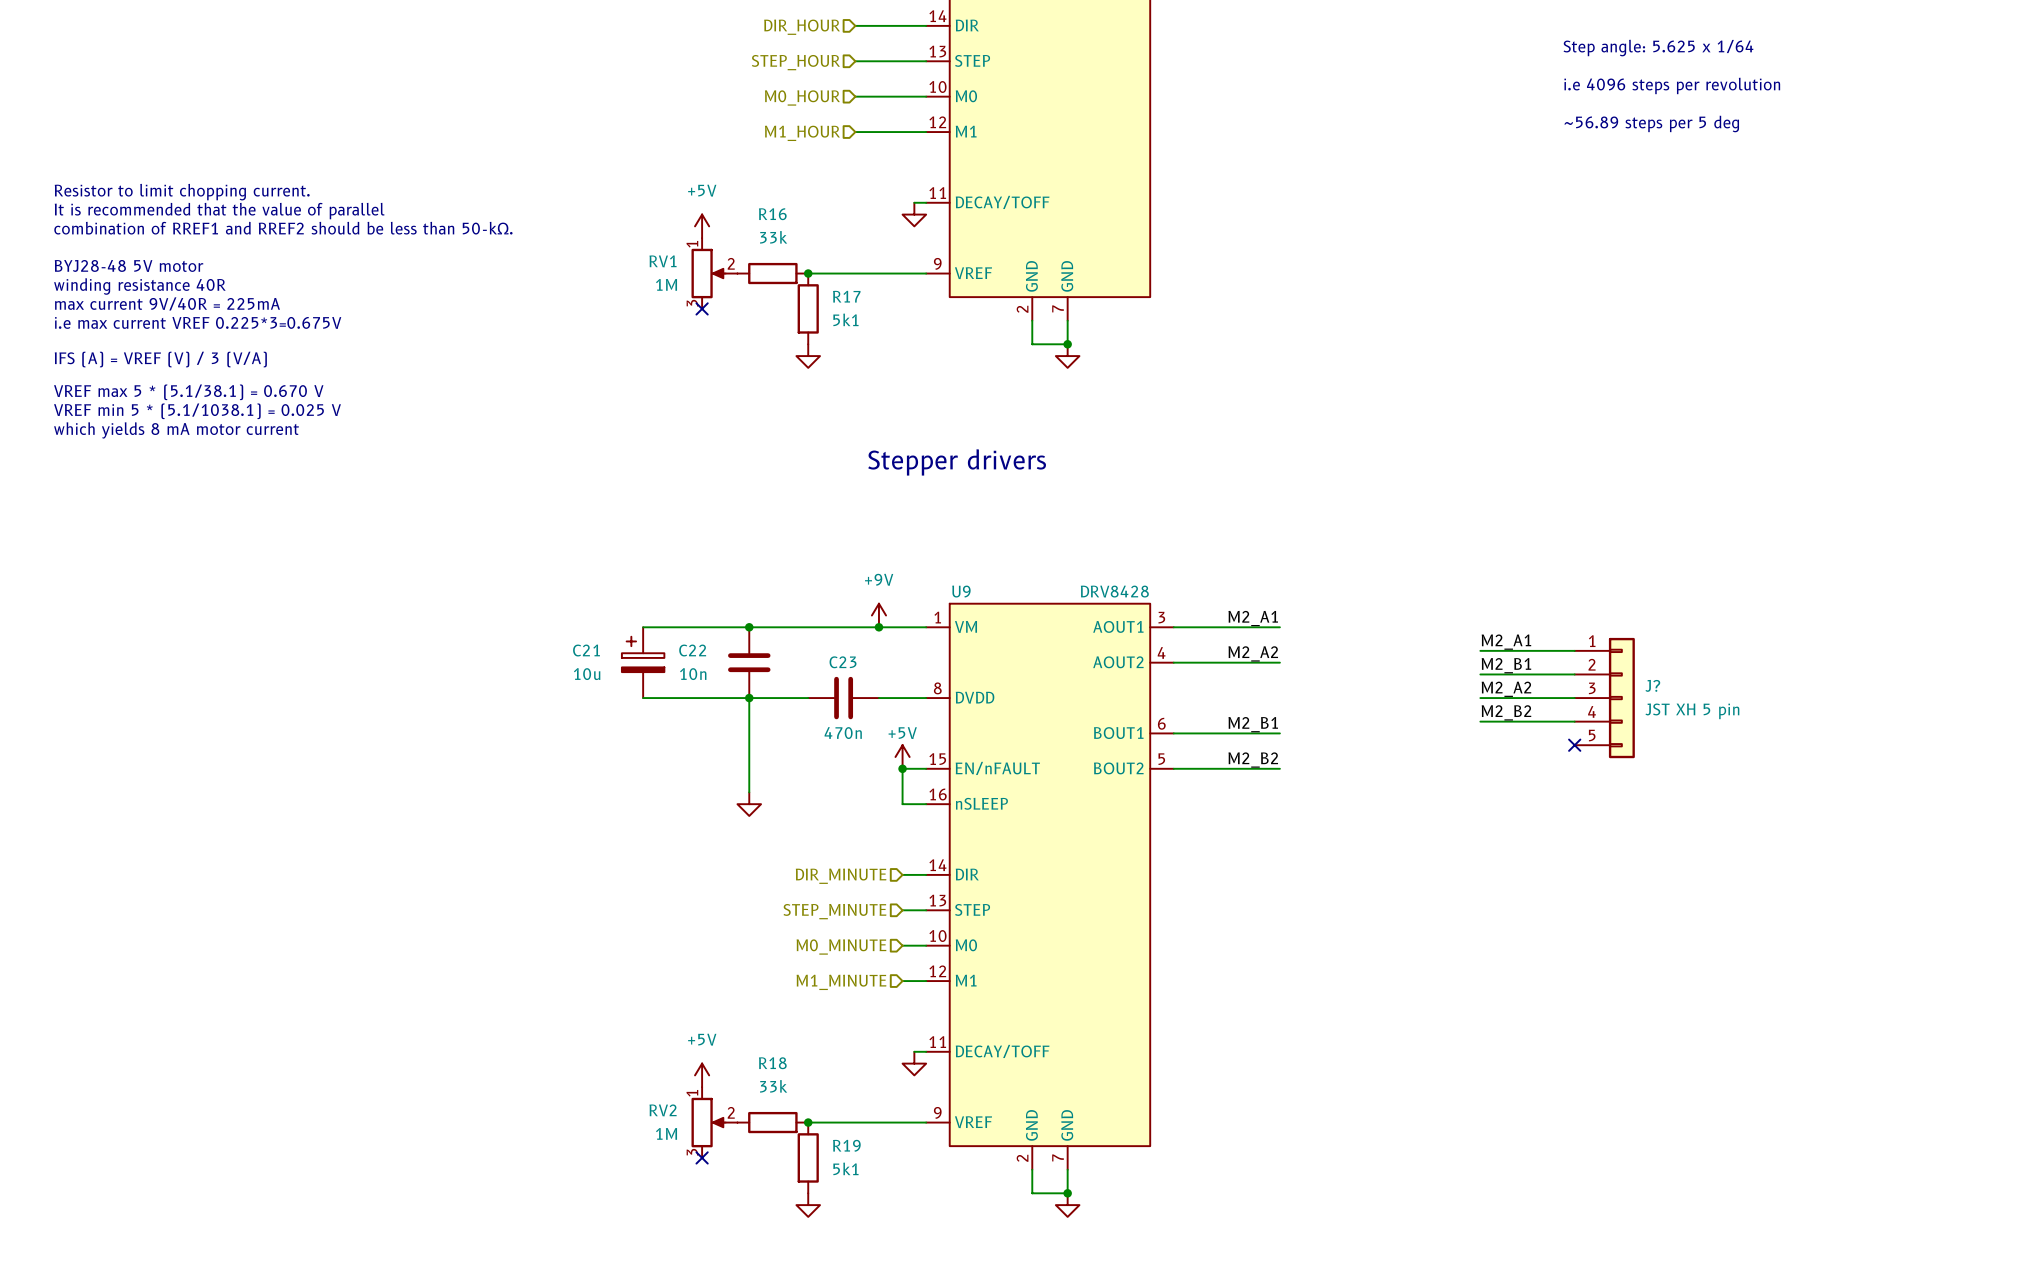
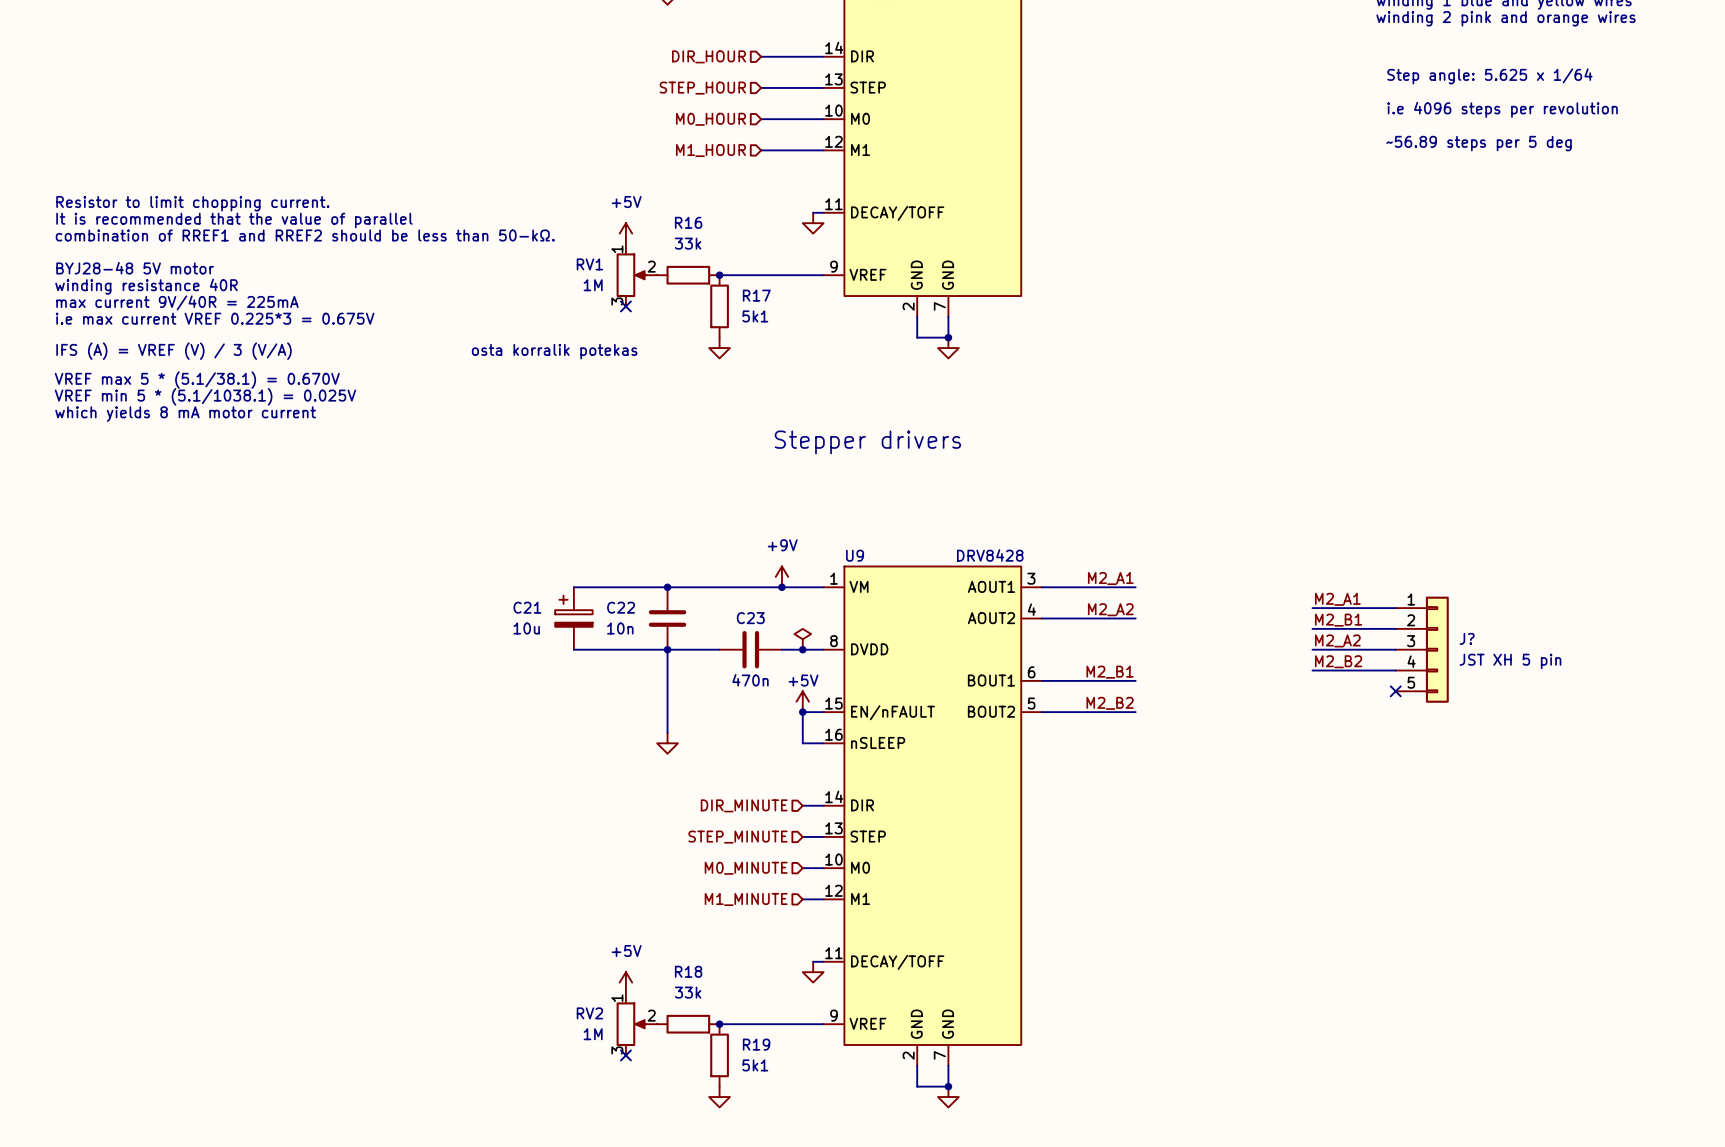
text: i.e max current VREF 0.225*3=0.675V (198, 322) -> i.e max current VREF 0.225*3 = 0.675V (215, 318)
text: none -> osta korralik potekas (554, 351)
text: VREF max 5 * (5.1/38.1) = 0.670 V (188, 392) -> VREF max 5 * (5.1/38.1) = 0.670V (197, 380)
text: VREF min 5 * (5.1/1038.1) = 0.025 V (197, 411) -> VREF min 5 * (5.1/1038.1) = 0.025V (205, 396)
power symbol: none -> (802, 639)
junction: none -> (802, 649)

